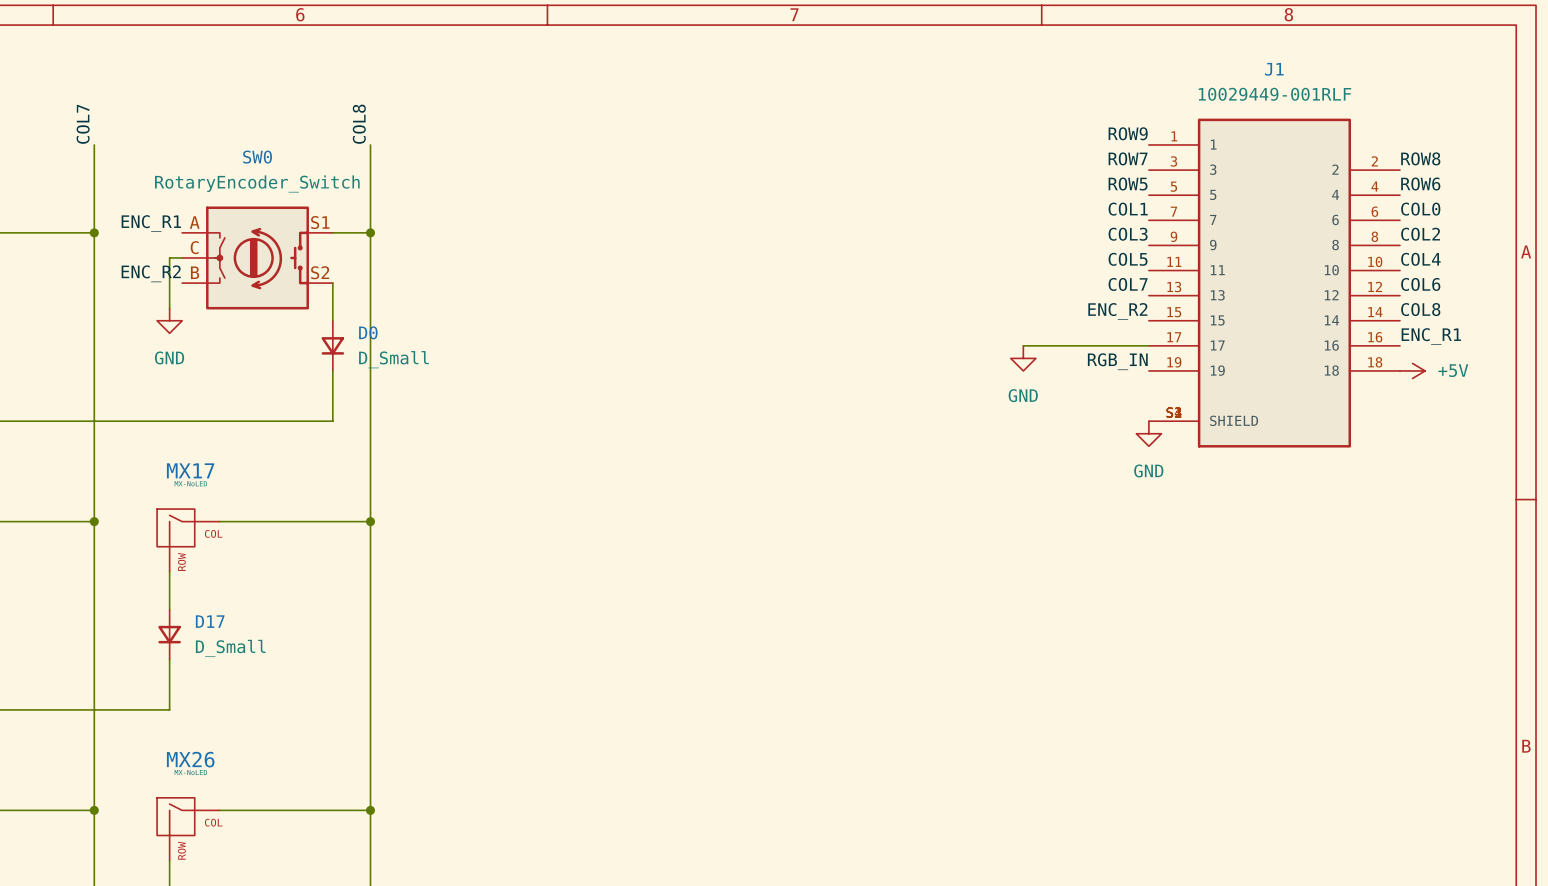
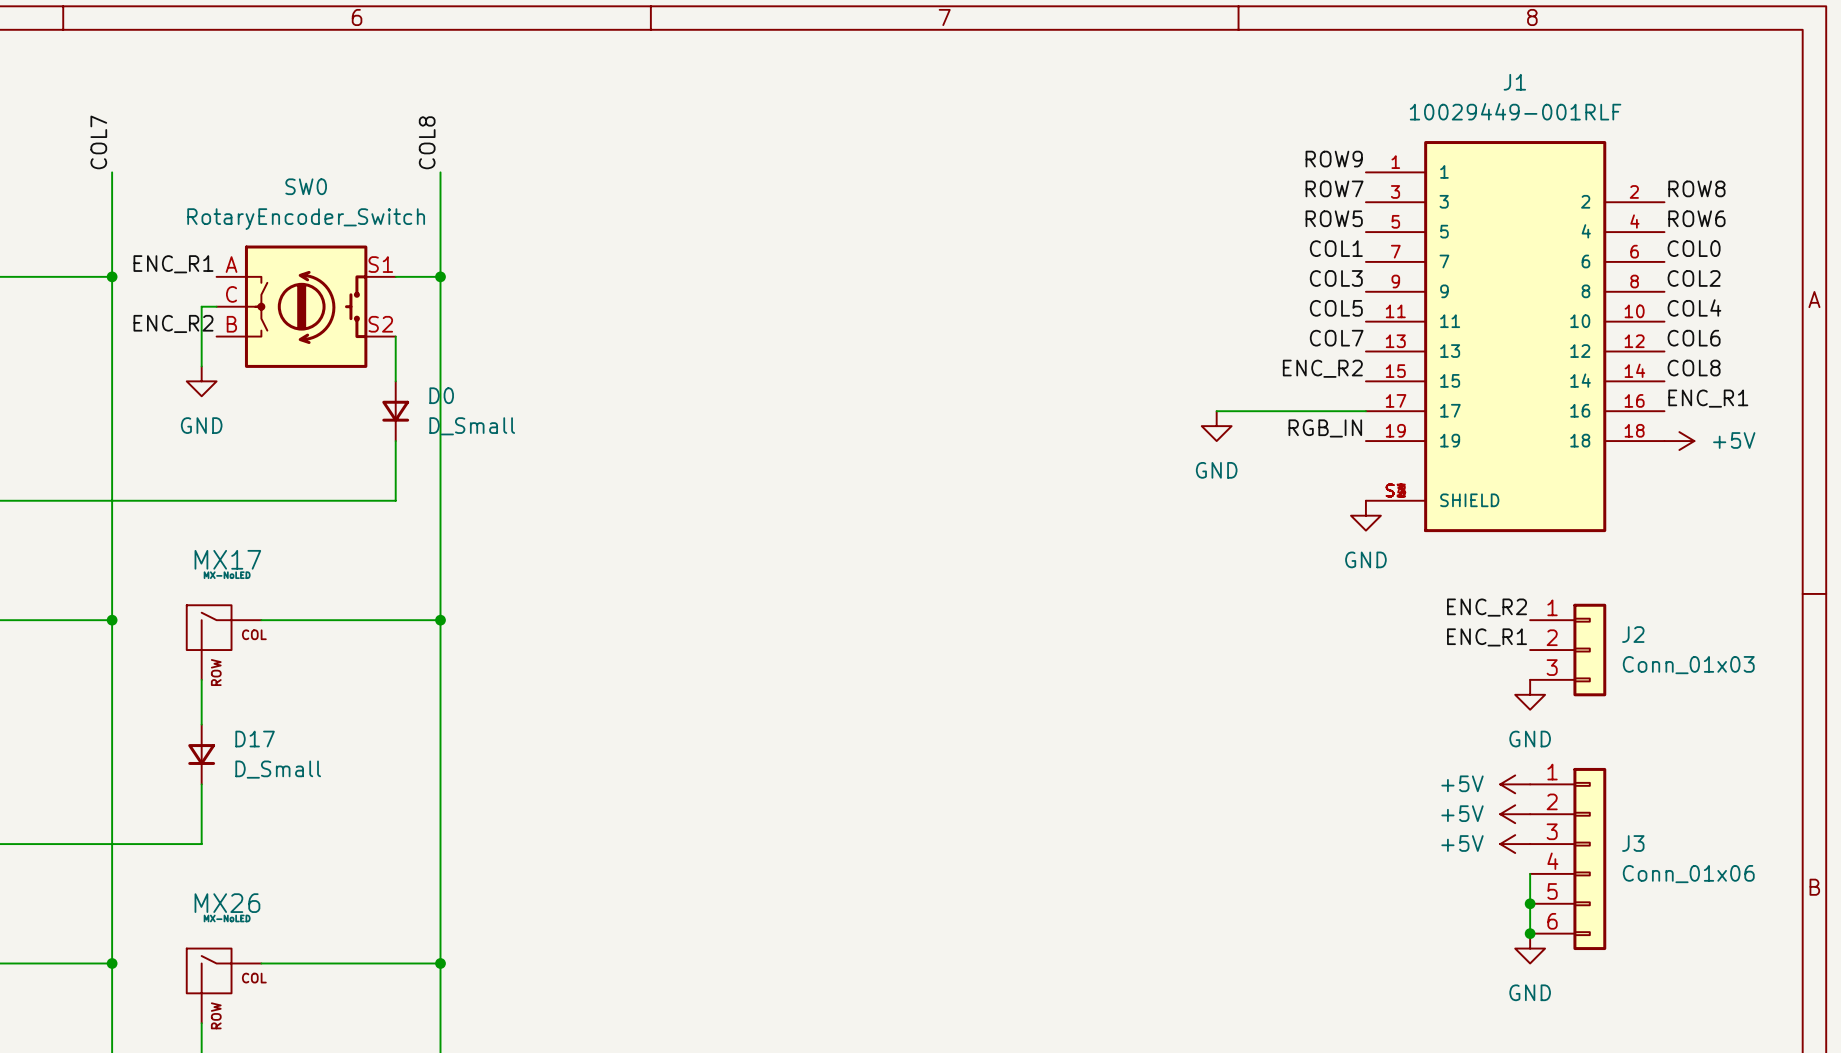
label: none -> ENC_R2 (1487, 607)
label: none -> ENC_R1 (1487, 637)
J2: none -> Conn_01x03 (1568, 650)
power symbol: none -> GND (1530, 694)
power symbol: none -> +5V (1515, 784)
power symbol: none -> +5V (1515, 814)
power symbol: none -> +5V (1515, 844)
J3: none -> Conn_01x06 (1568, 859)
wire: none -> (1530, 873) (1530, 933)
junction: none -> (1530, 903)
junction: none -> (1530, 933)
power symbol: none -> GND (1530, 948)

